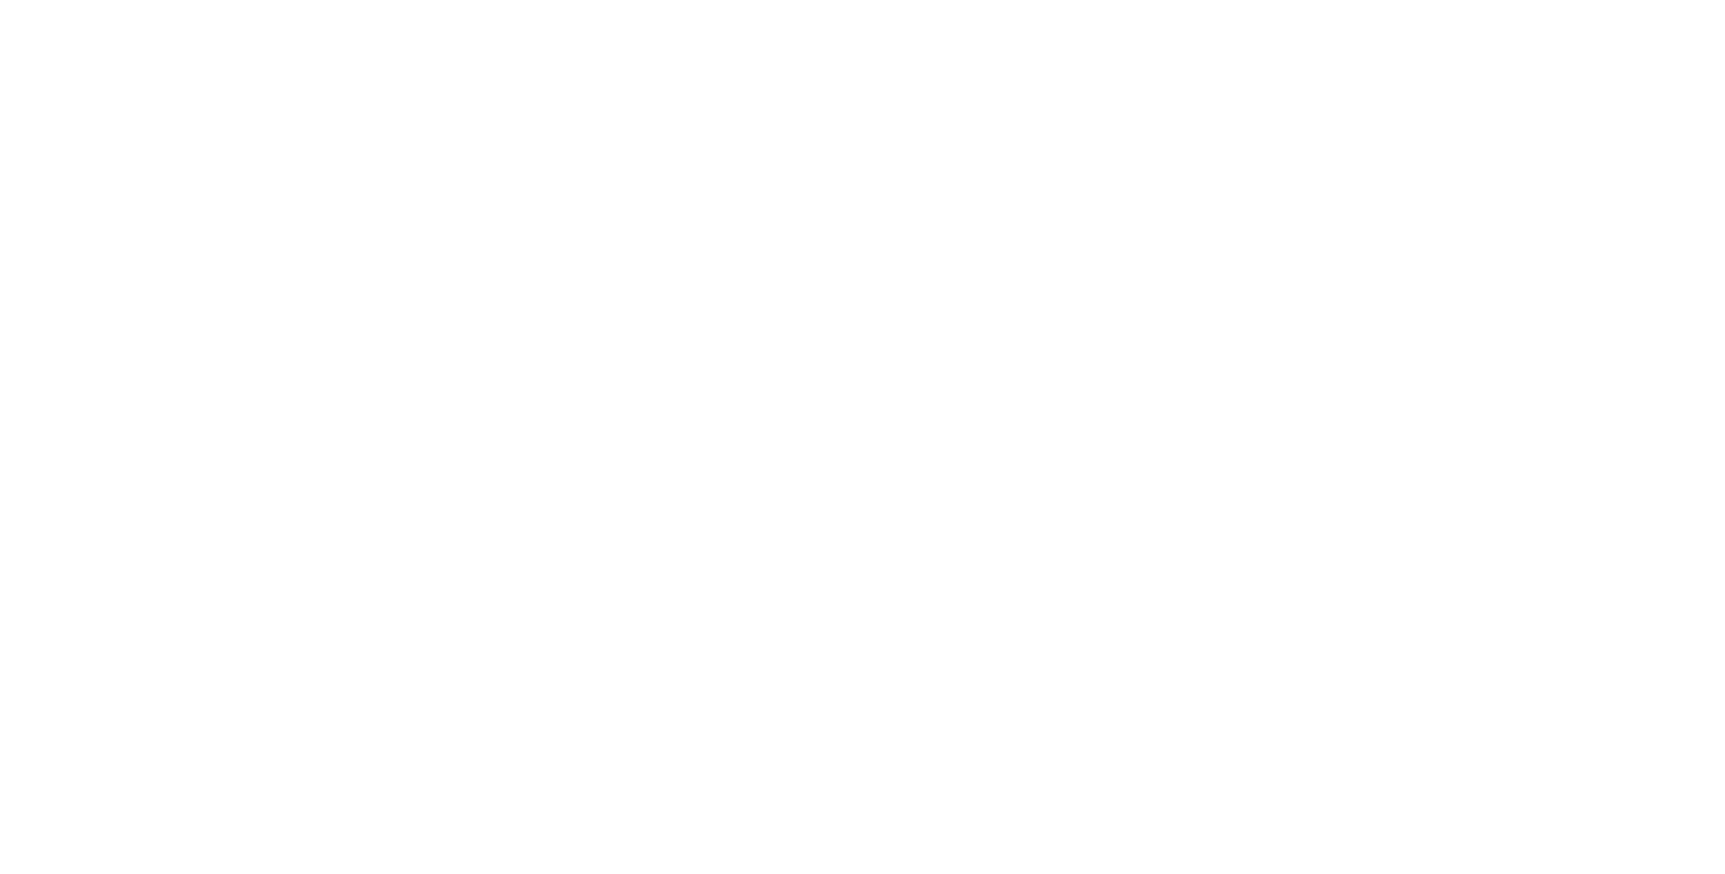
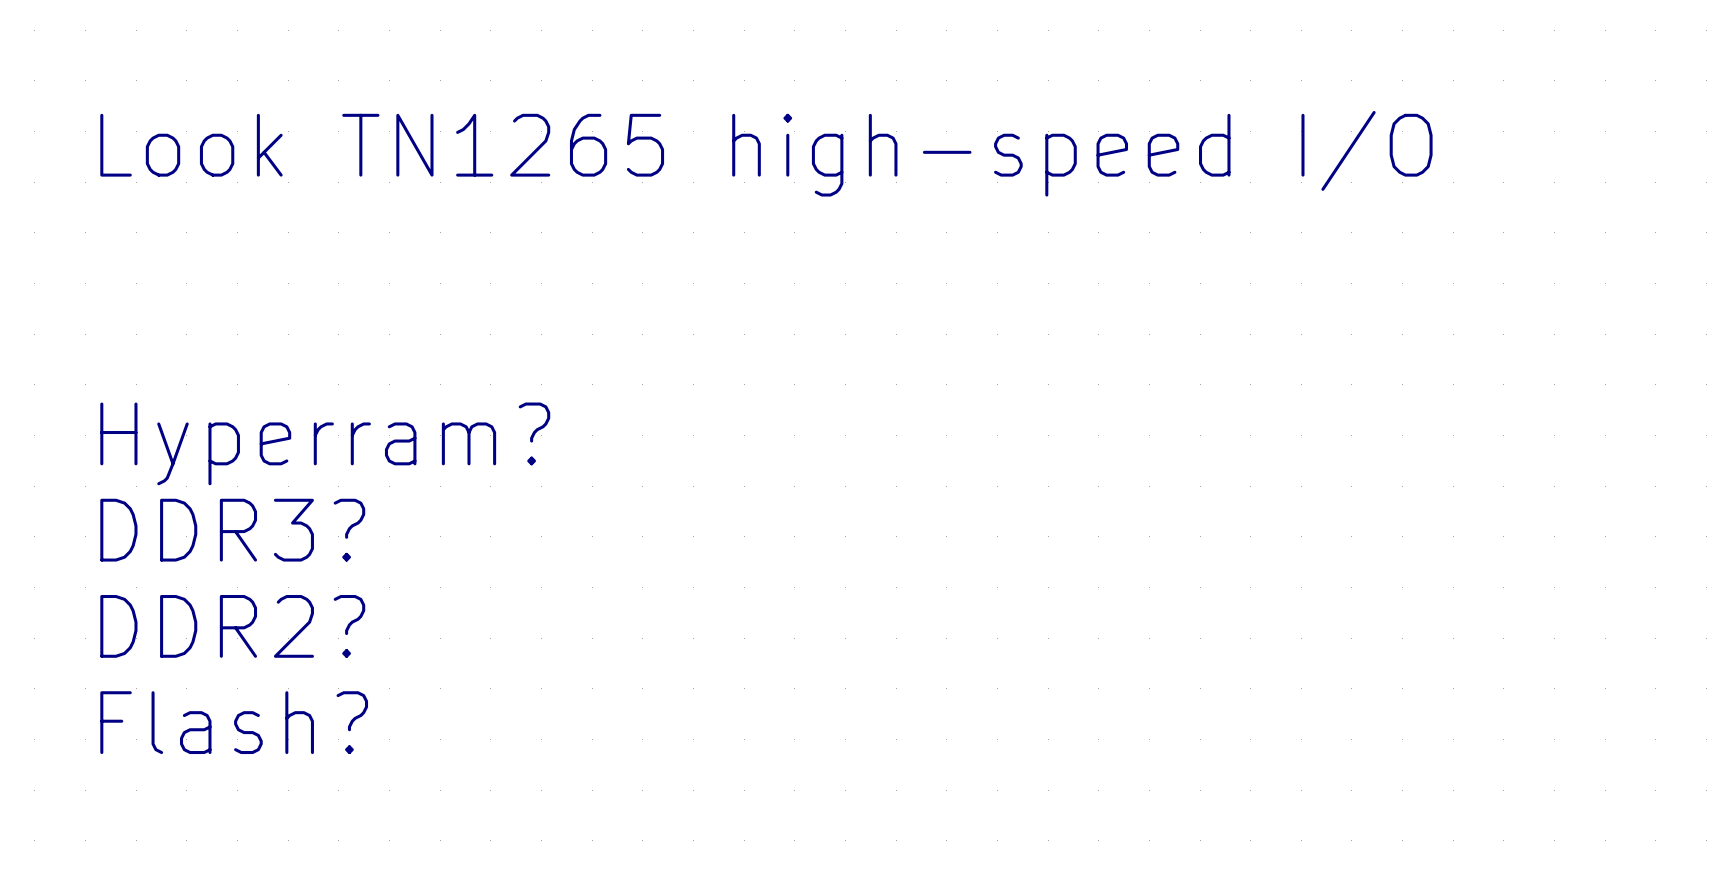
text: none -> Look TN1265 high-speed I/O (766, 153)
text: none -> Hyperram? (325, 443)
text: none -> DDR3? (232, 530)
text: none -> DDR2? (232, 626)
text: none -> Flash? (234, 722)

